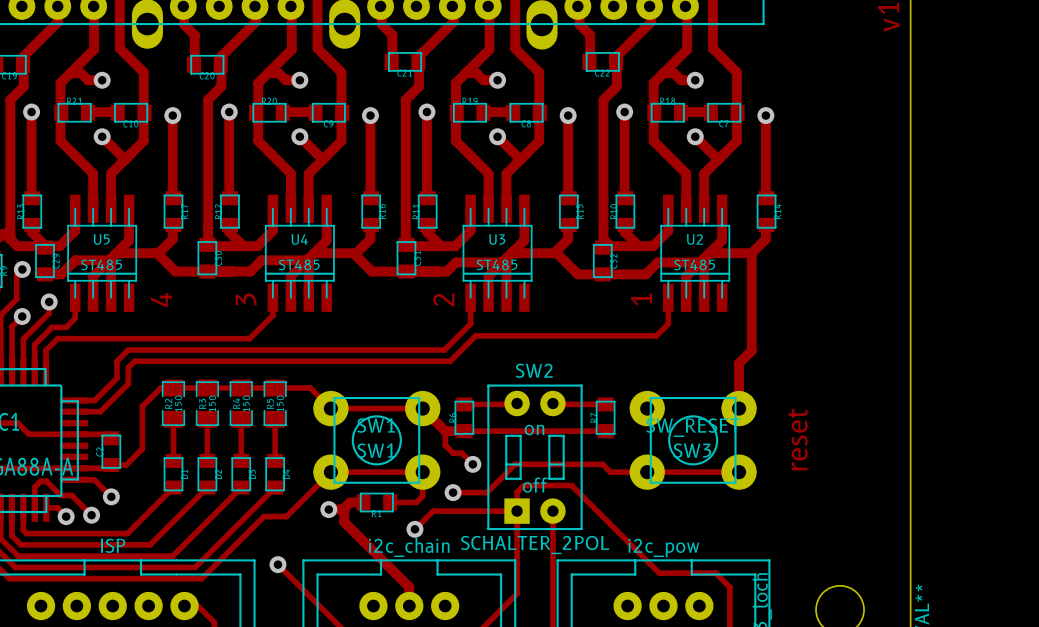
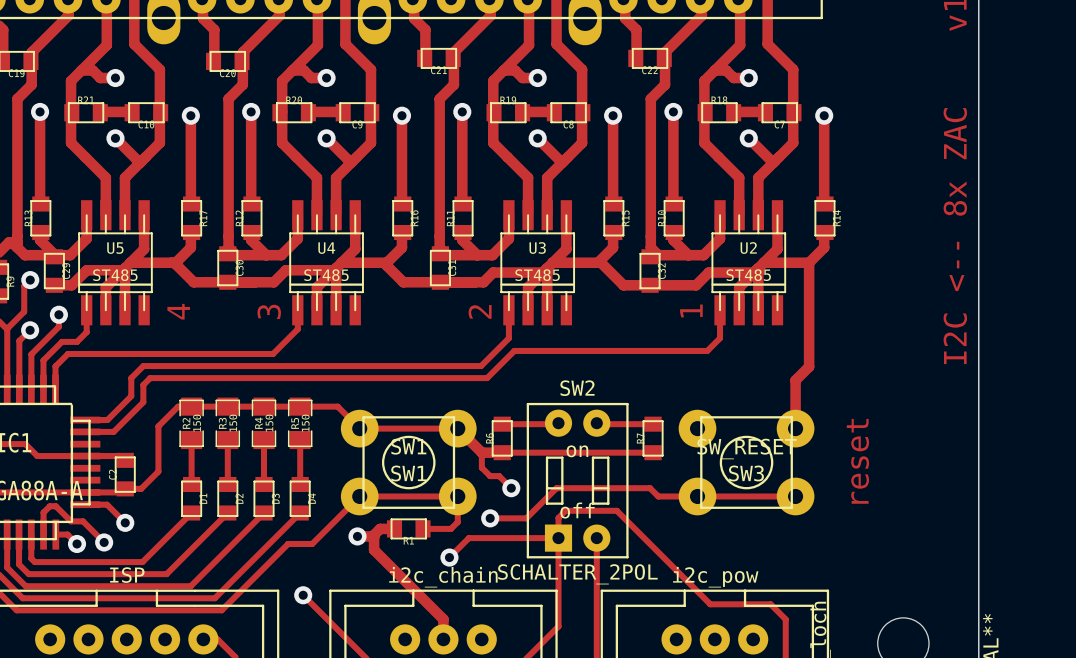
text: none -> I2C <-- 8x ZAC (955, 236)

